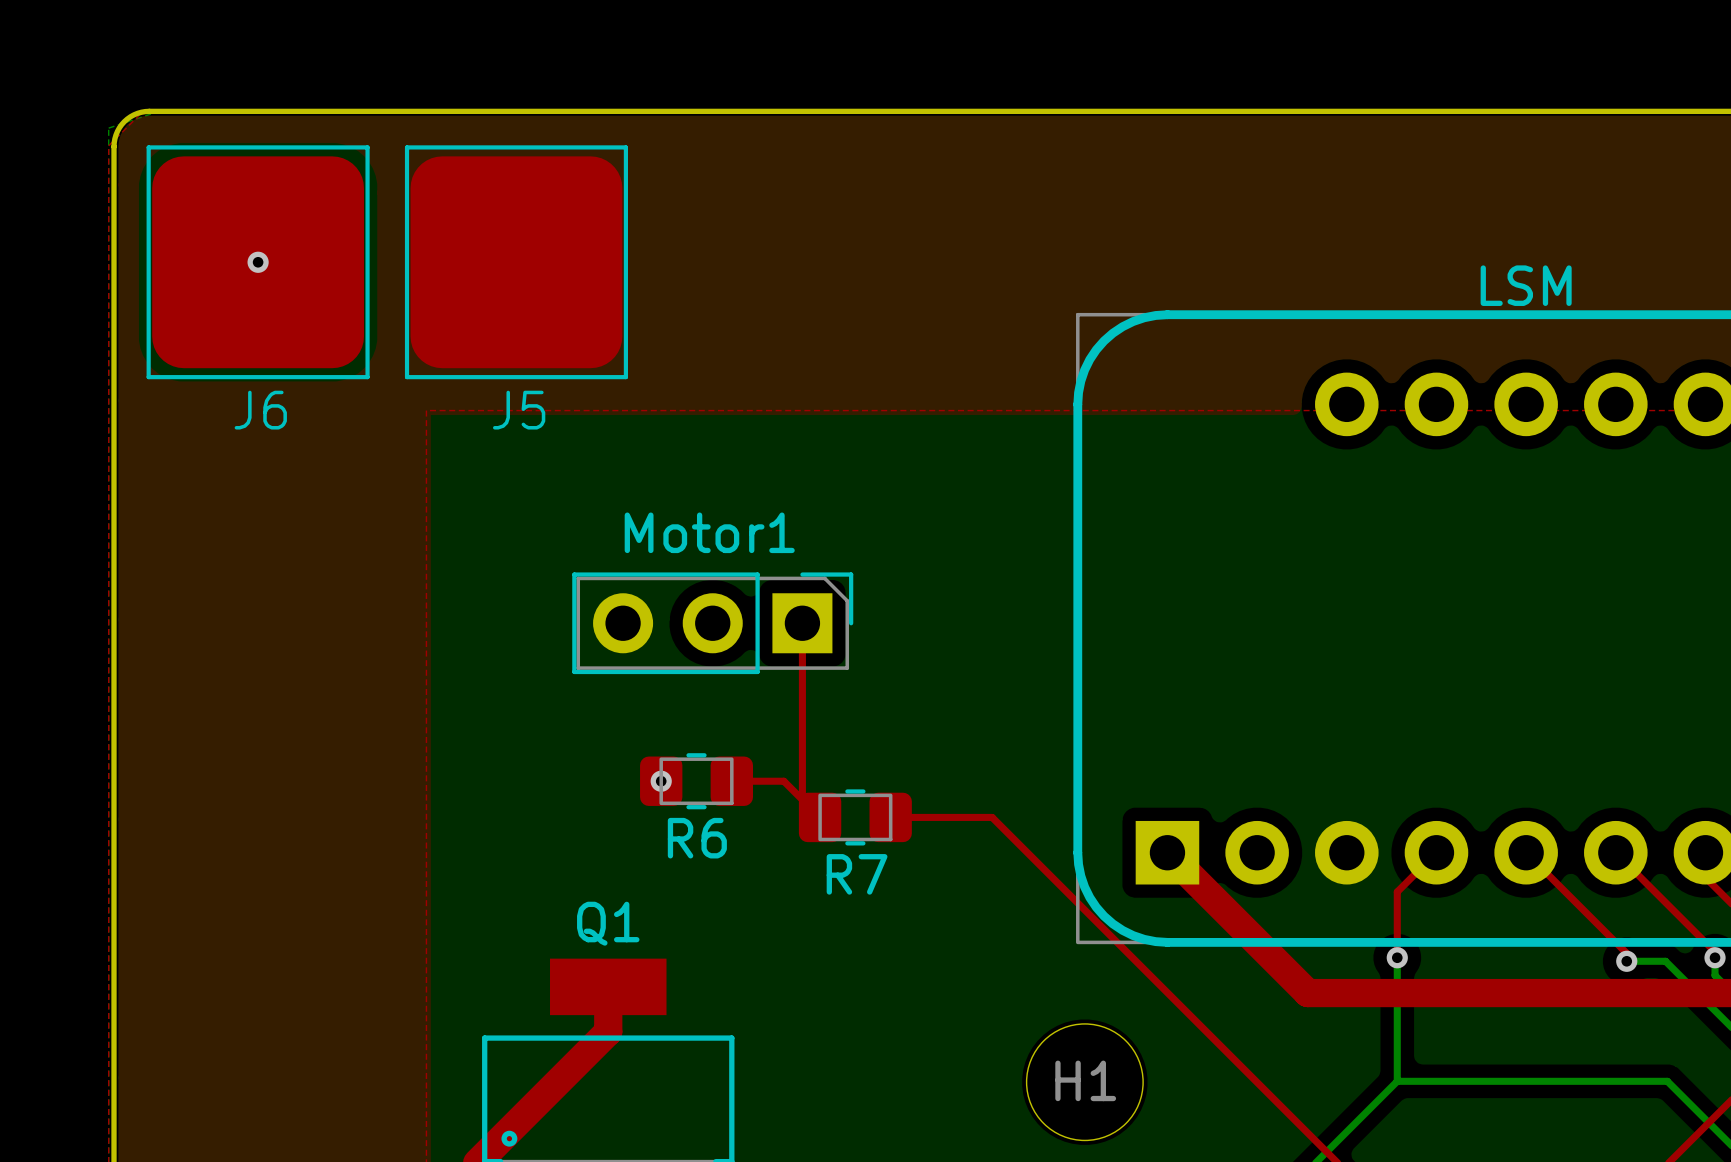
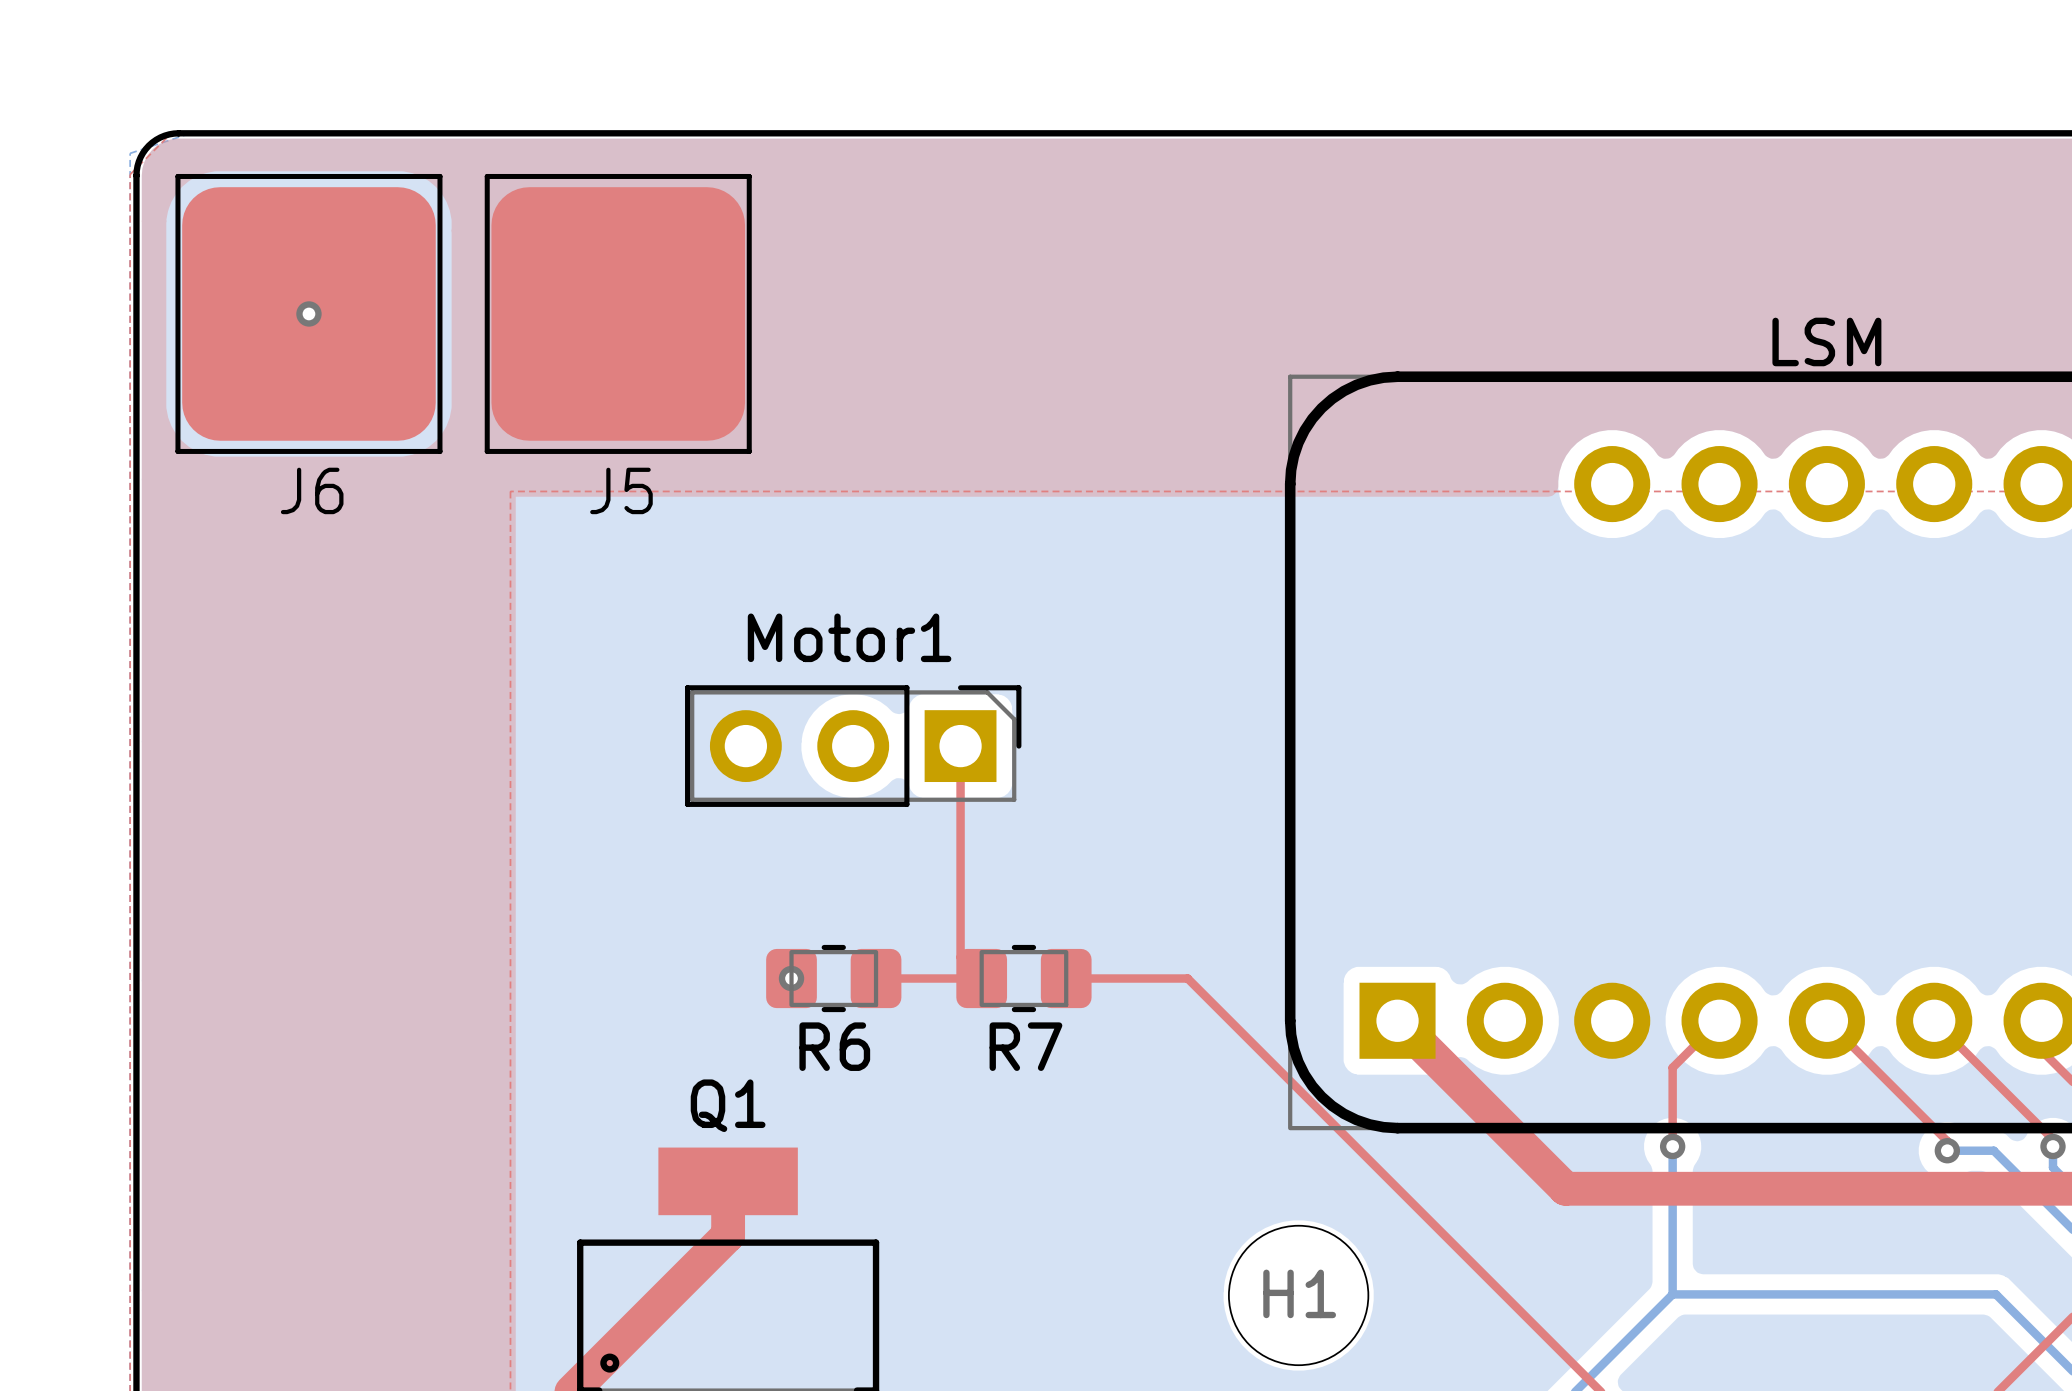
via position: (661, 781) -> (791, 978)
R6 position: (696, 781) -> (833, 978)
top track: (731, 781) (783, 781) (802, 799) -> none
top track: none -> (876, 978) (981, 978)

